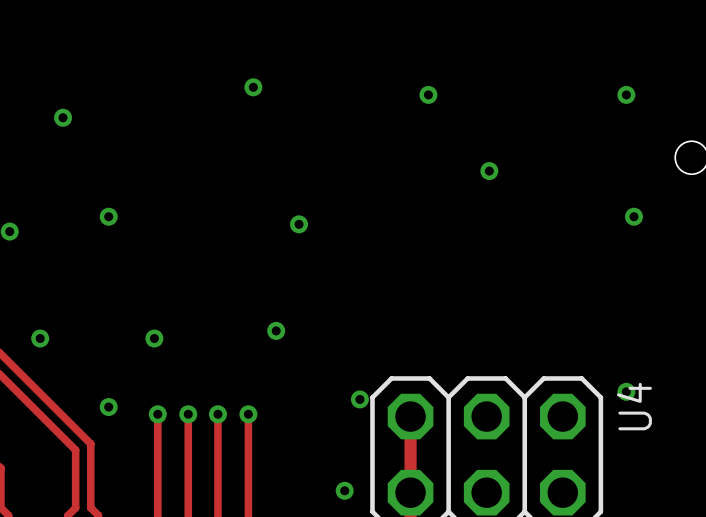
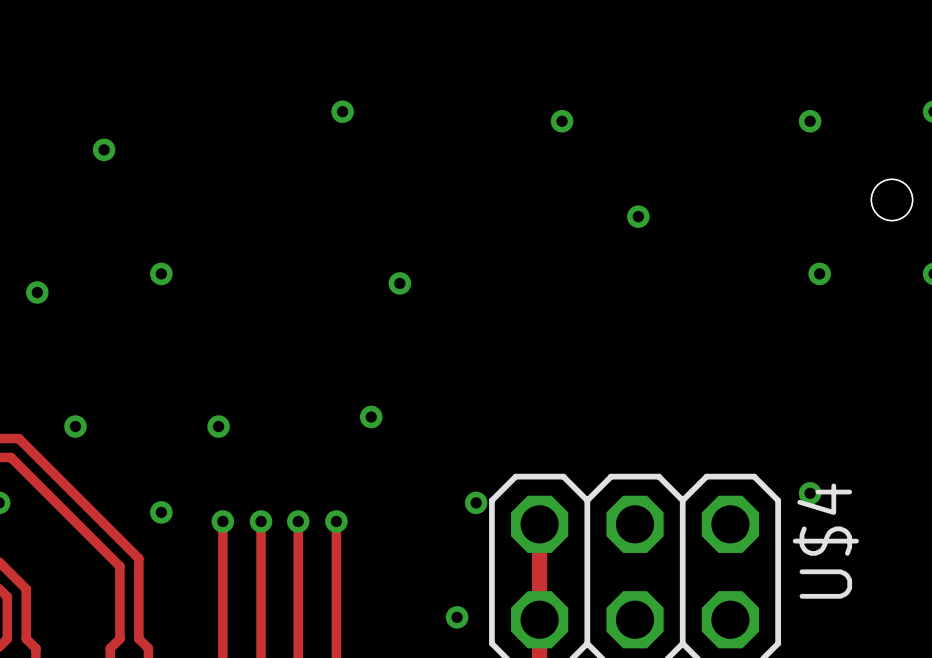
U4 name: U4 (634, 406) -> U$4 (825, 541)

